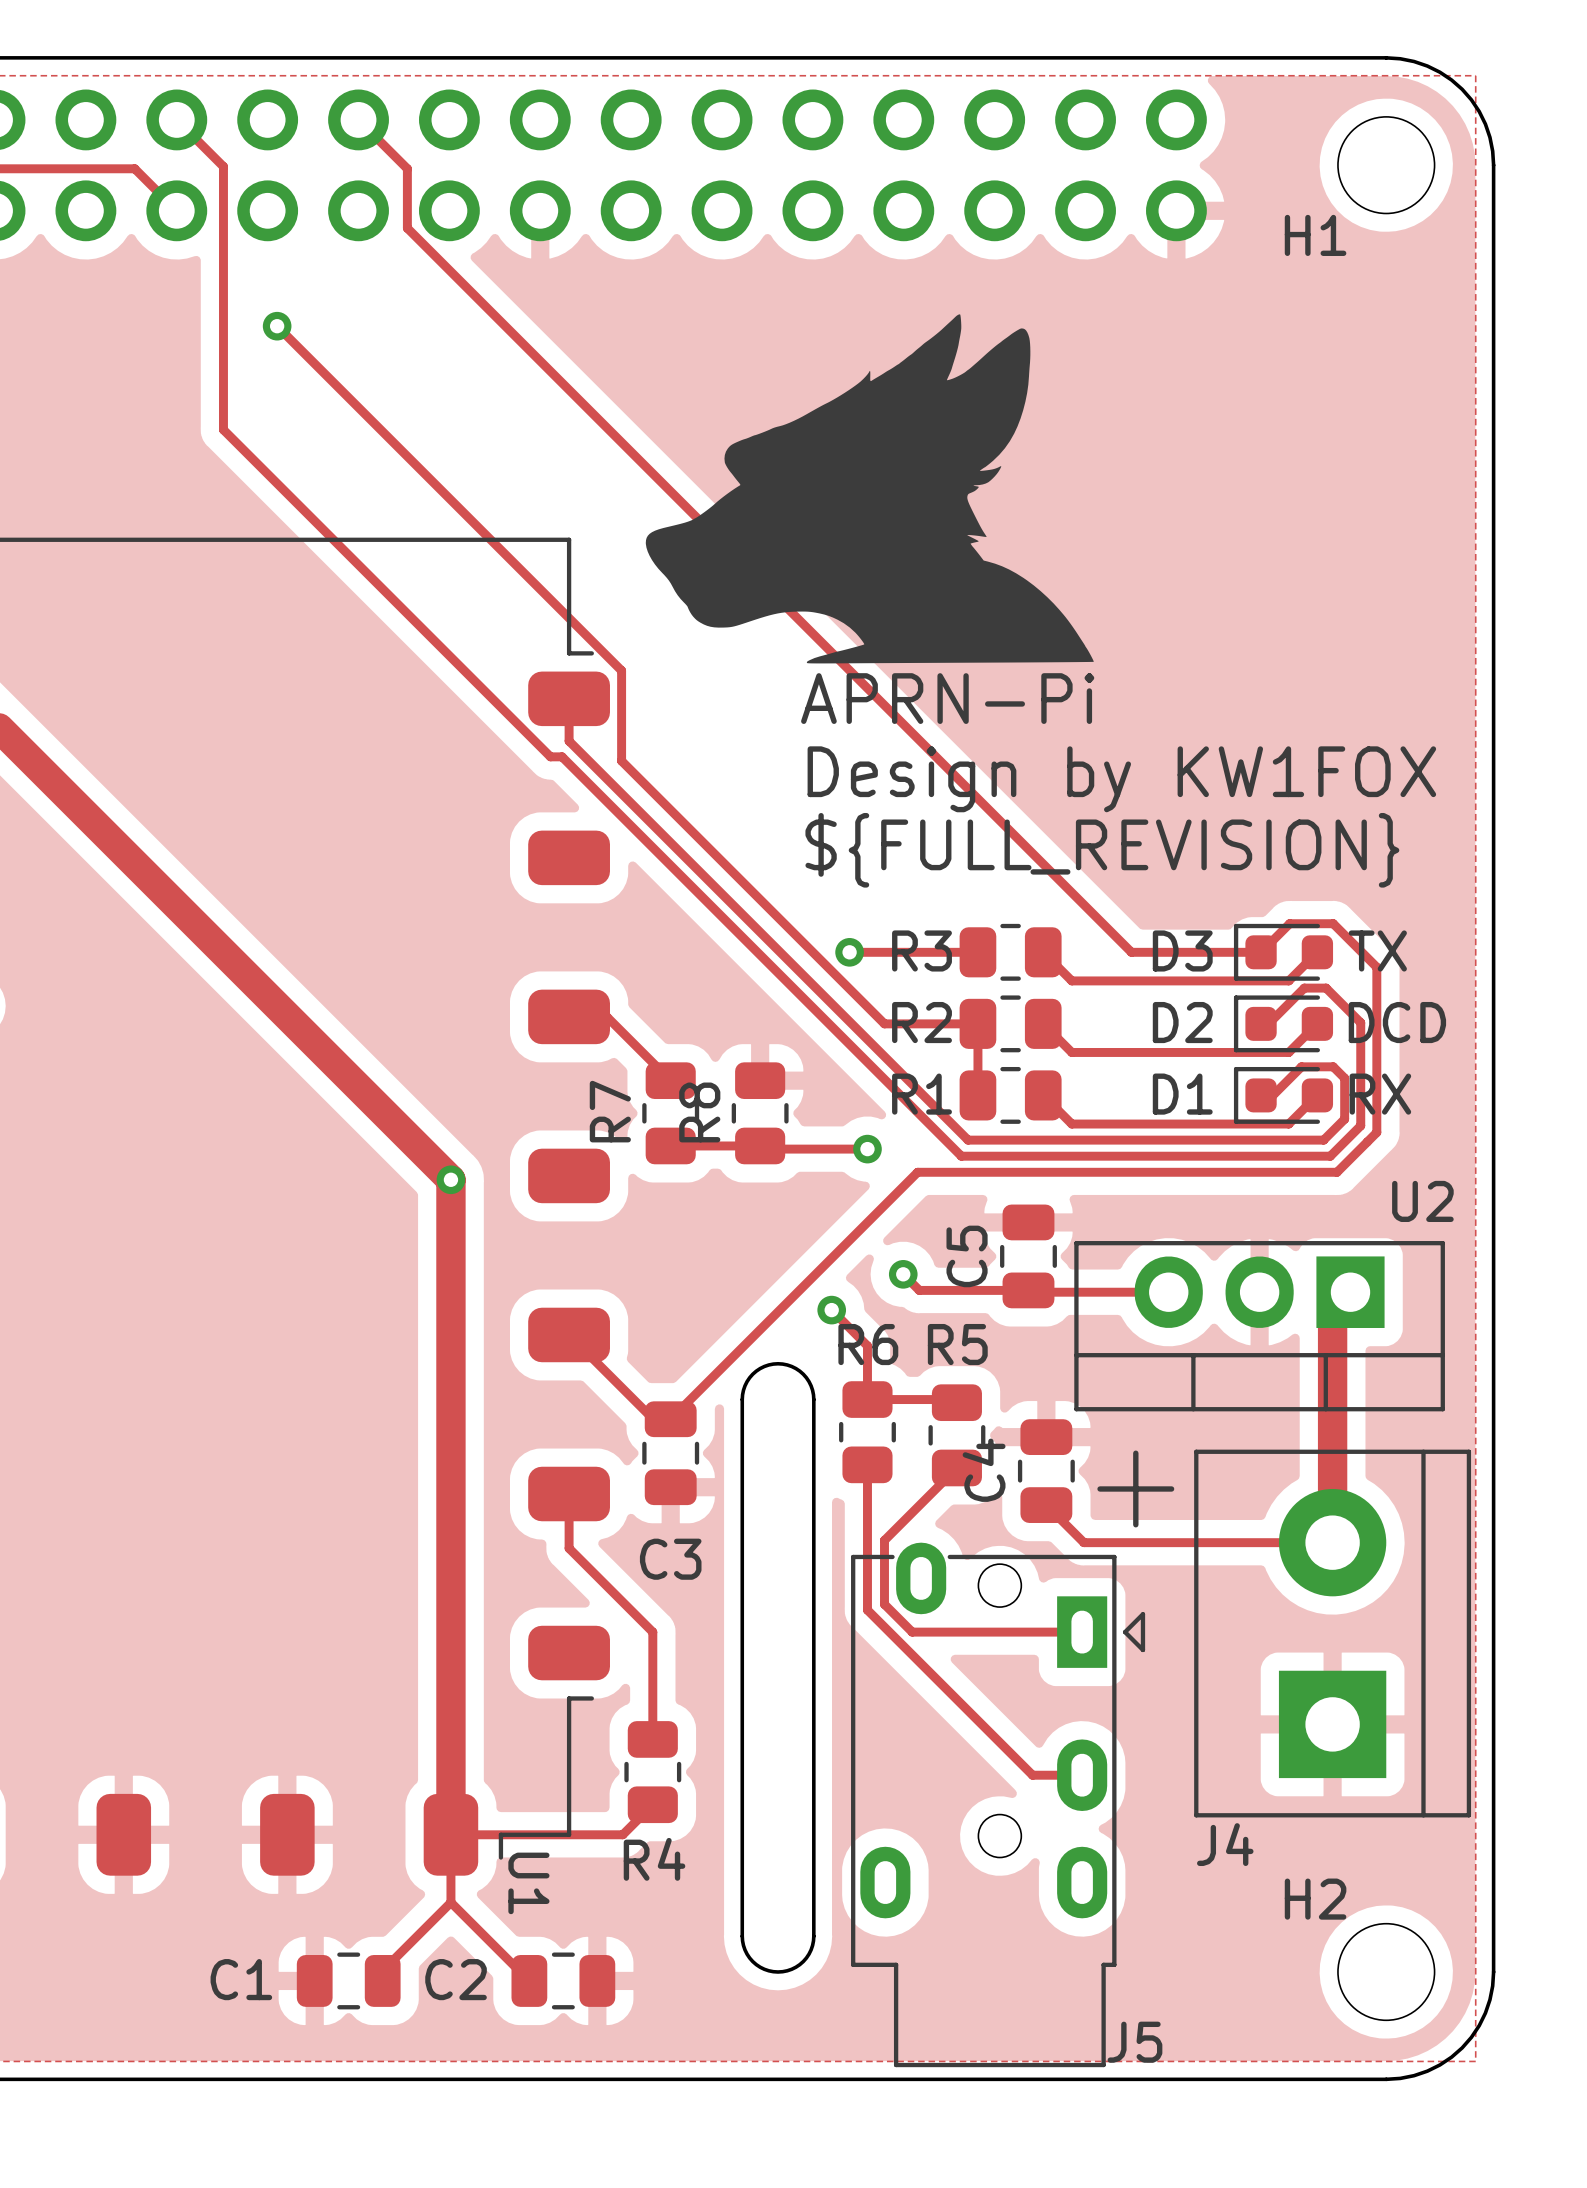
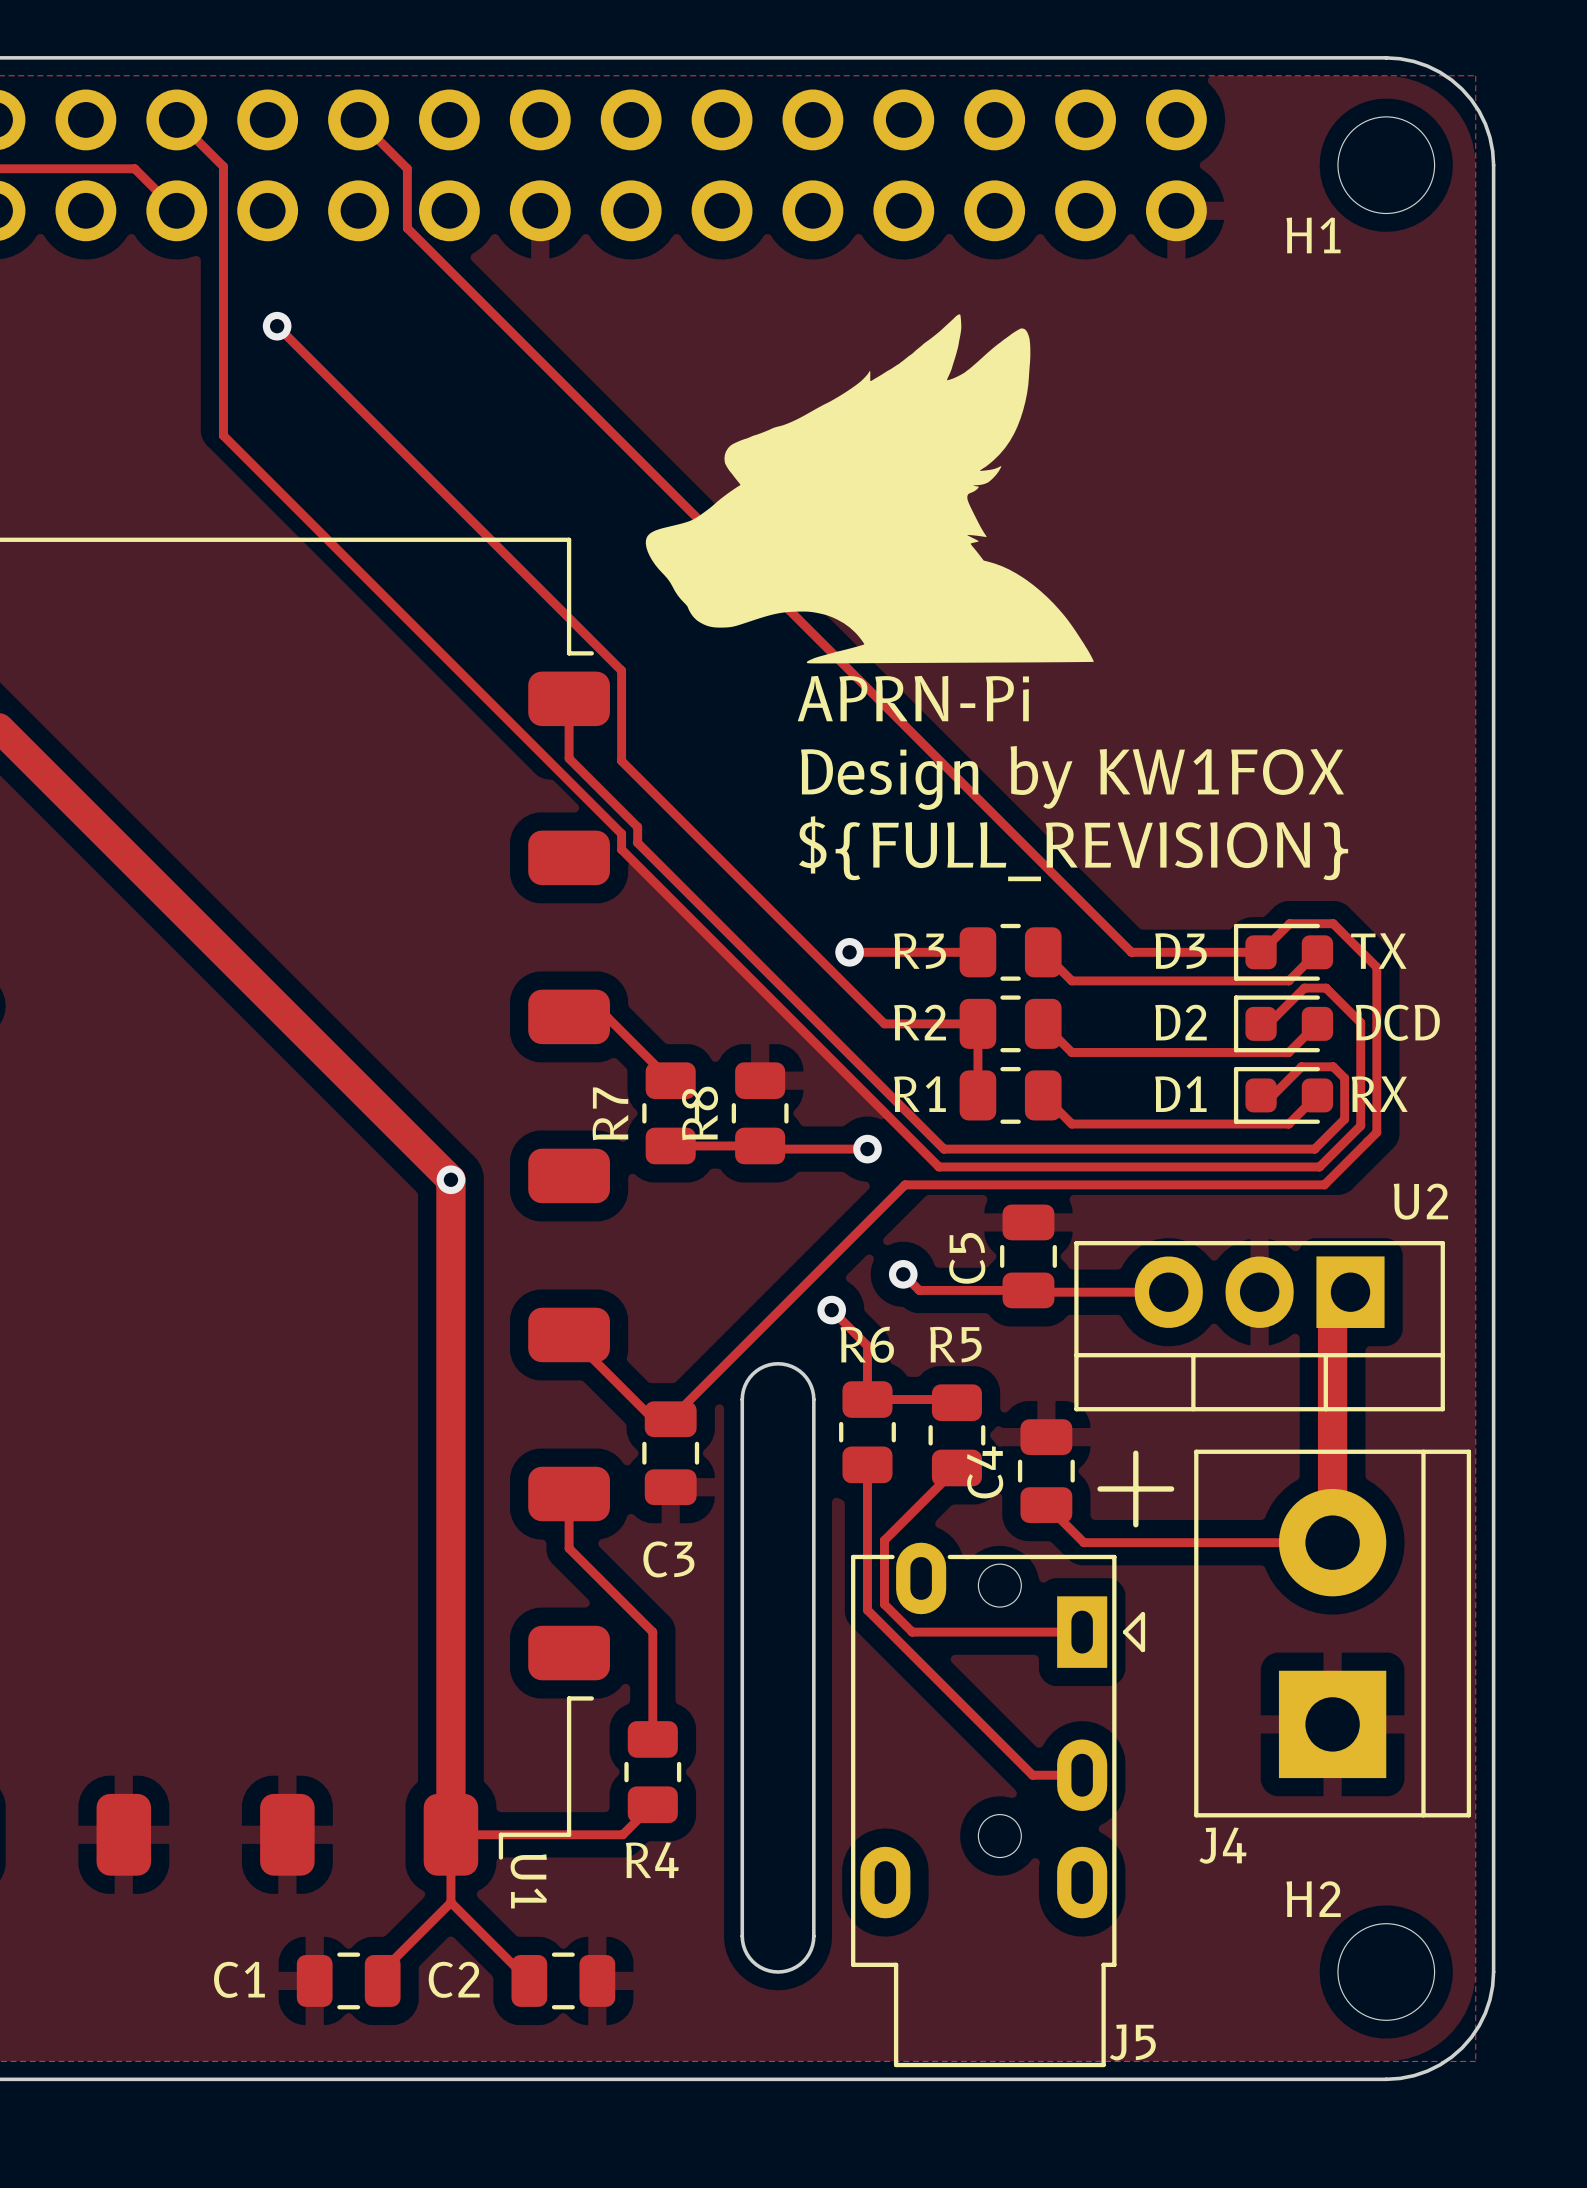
track: (223, 429) (550, 756) (562, 756) (961, 1156) (1330, 1156) -> (223, 429) (223, 435) (621, 833) (621, 849) (939, 1166) (1319, 1166) (1330, 1156)
track: (569, 741) (968, 1140) (1323, 1140) -> (569, 741) (569, 758) (637, 827) (637, 842) (943, 1149) (1314, 1149) (1323, 1140)
track: (1337, 1172) (917, 1172) (905, 1184) -> (1337, 1172) (1324, 1184) (905, 1184)

